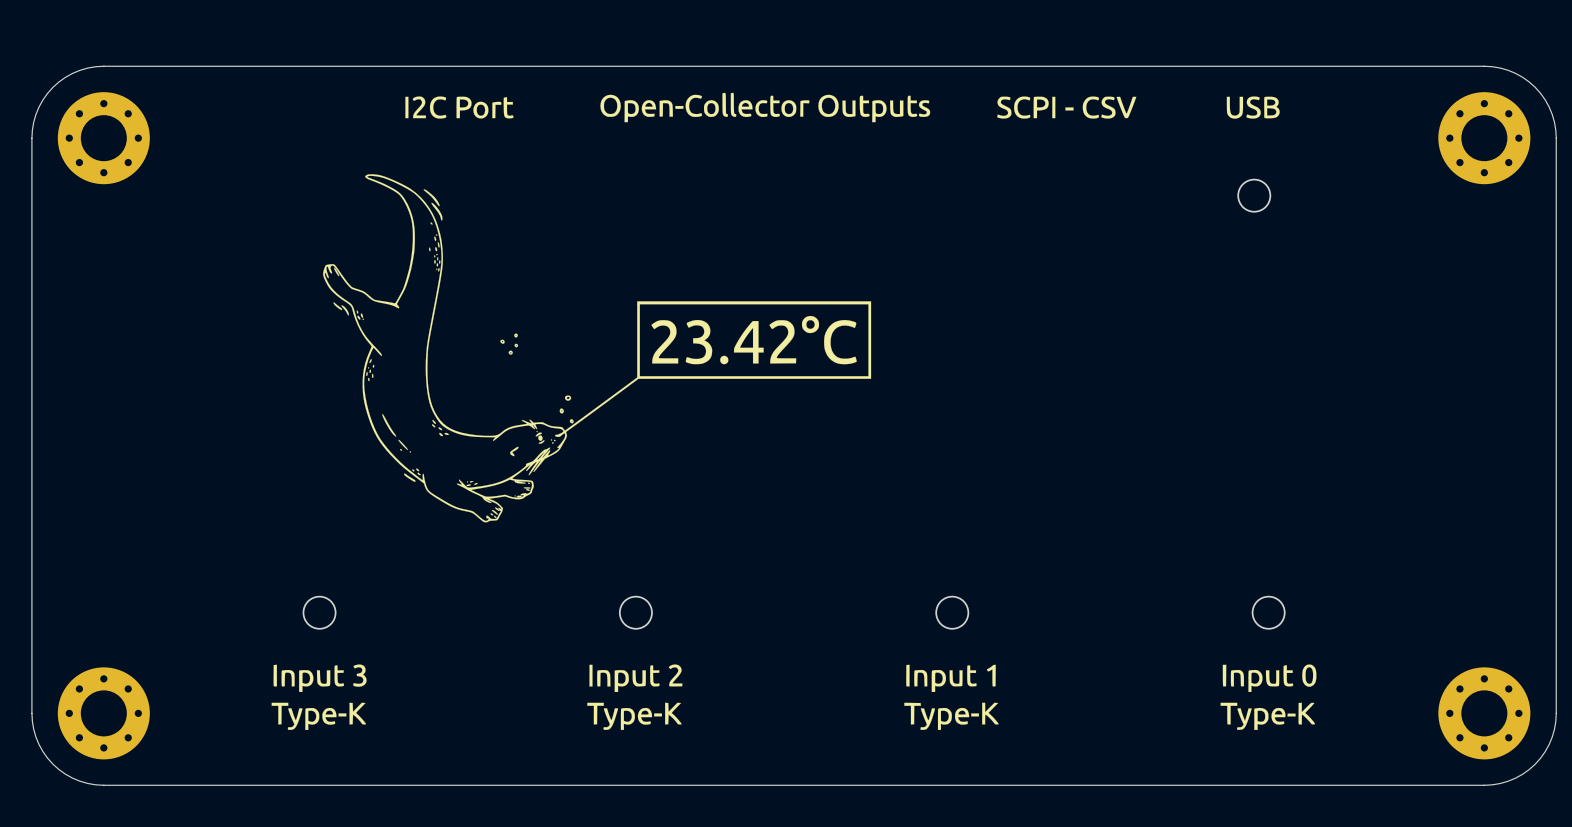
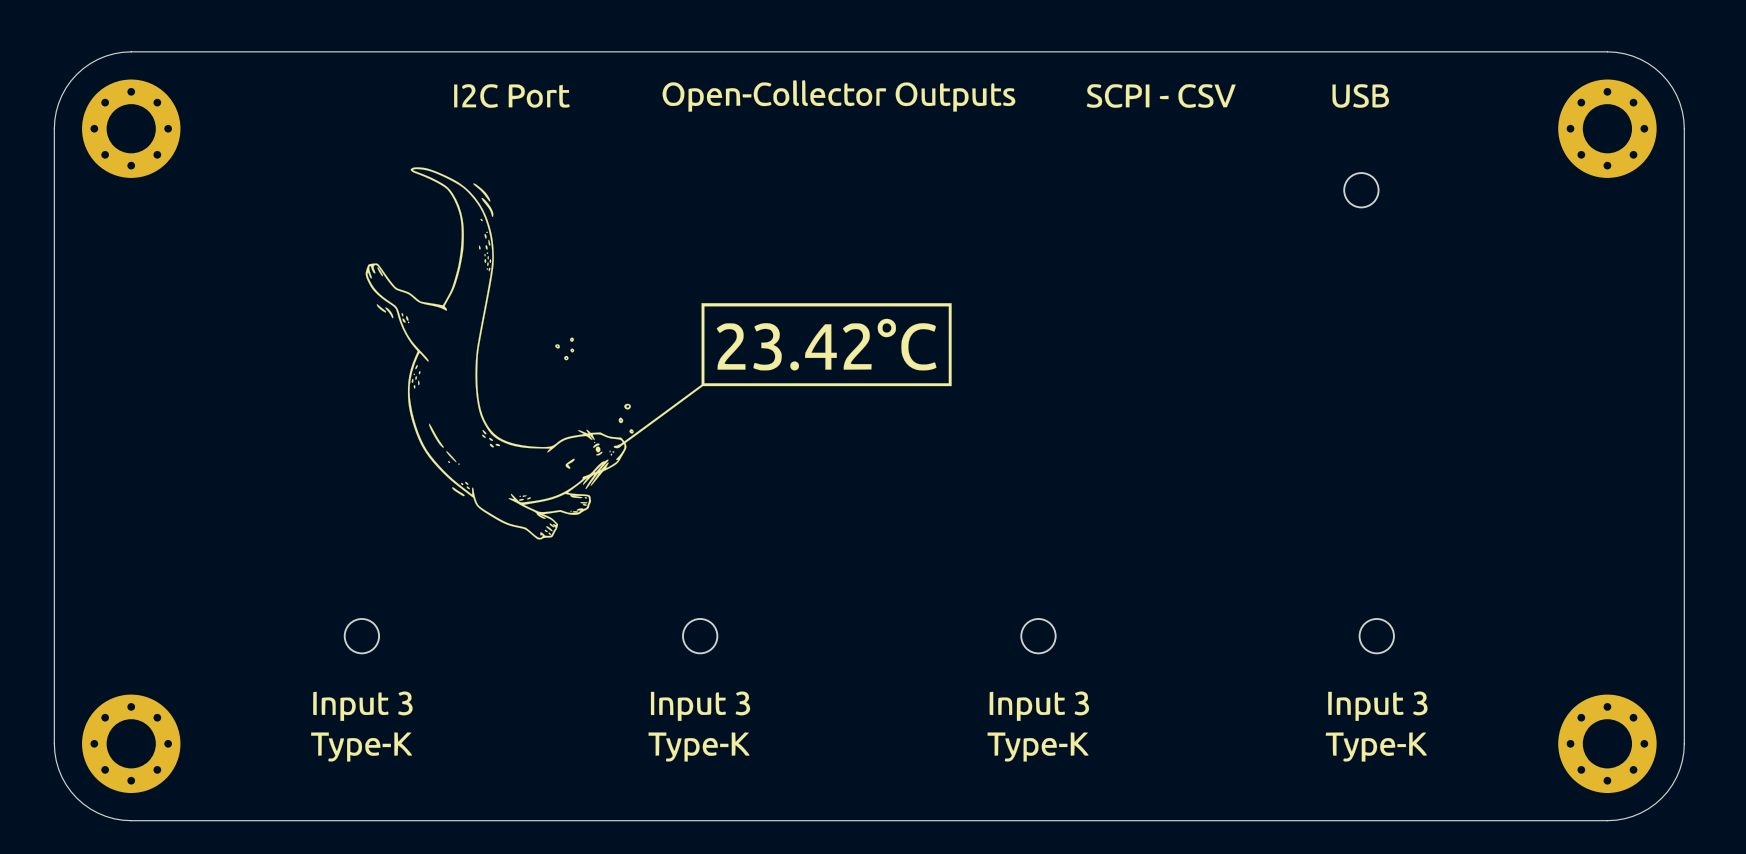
drawing shape: [271, 92, 1317, 730] -> [311, 80, 1428, 762]

